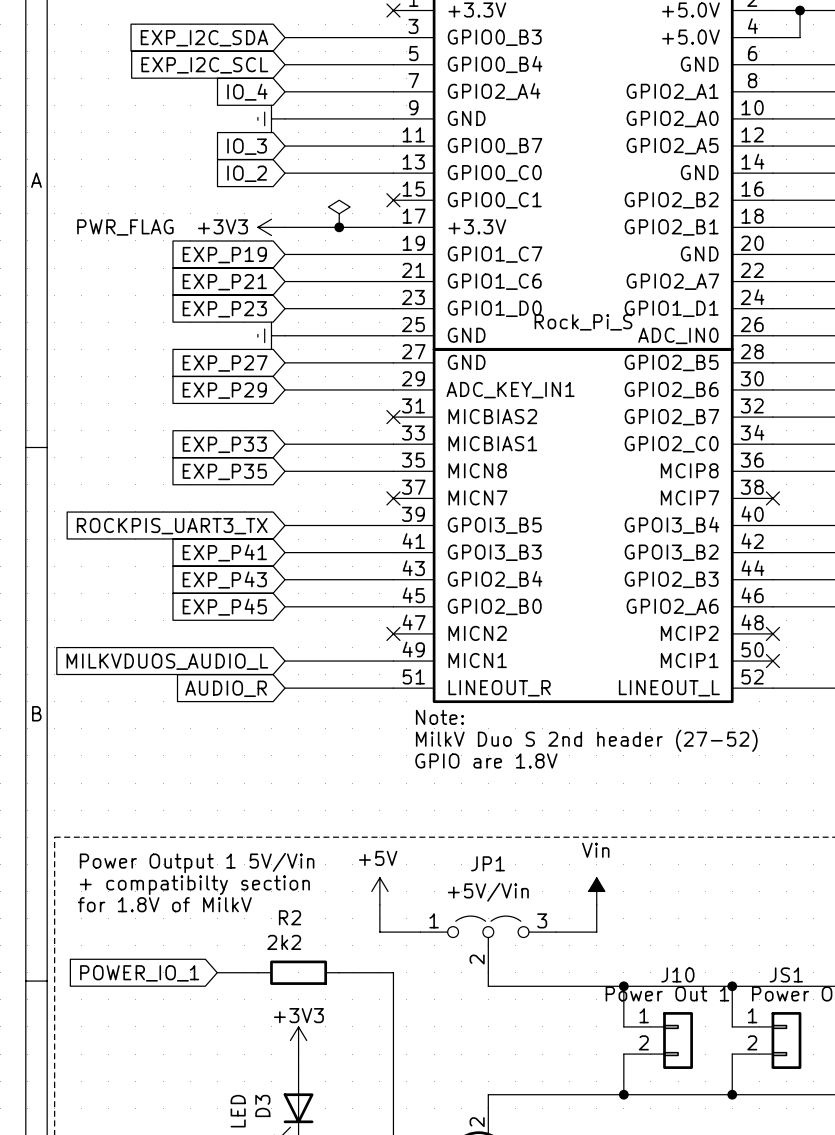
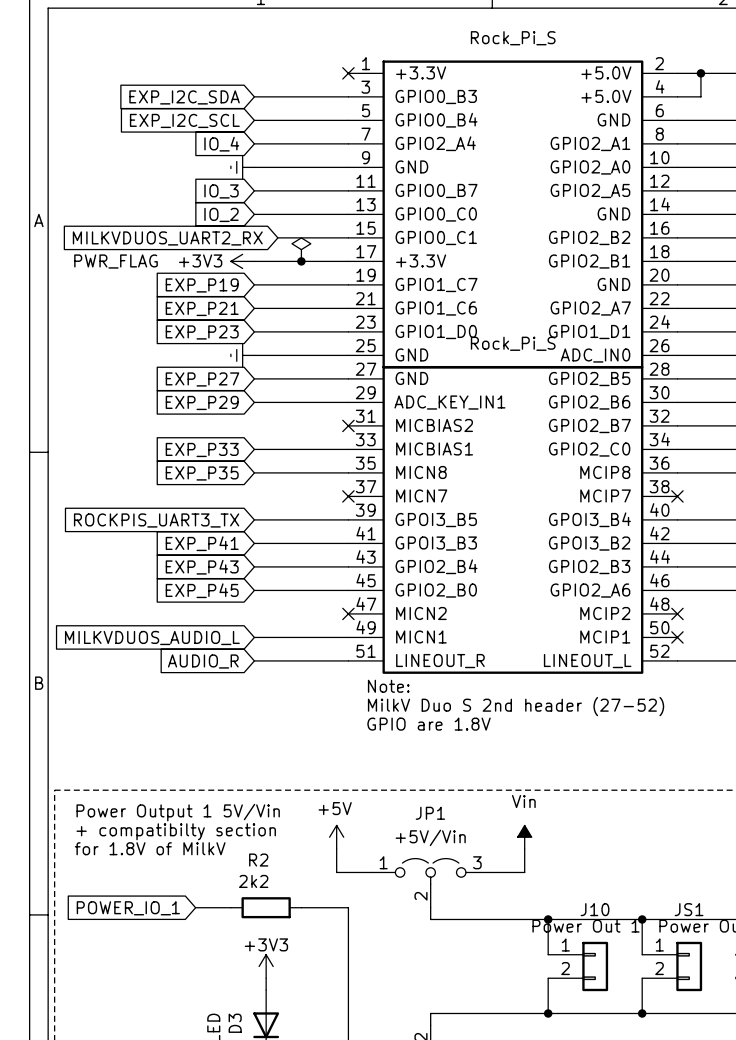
global label: none -> MILKVDUOS_UART2_RX (167, 238)
wire: none -> (277, 237) (348, 237)
no-connect mark: (393, 200) -> none

